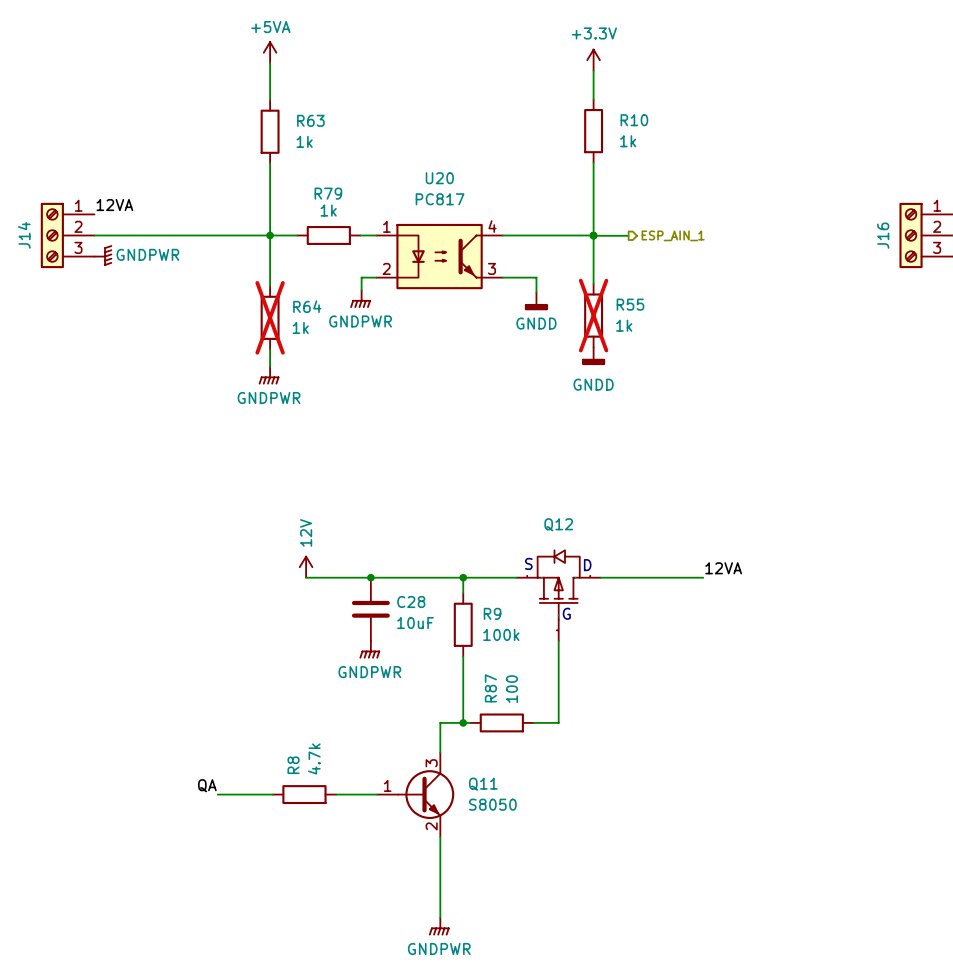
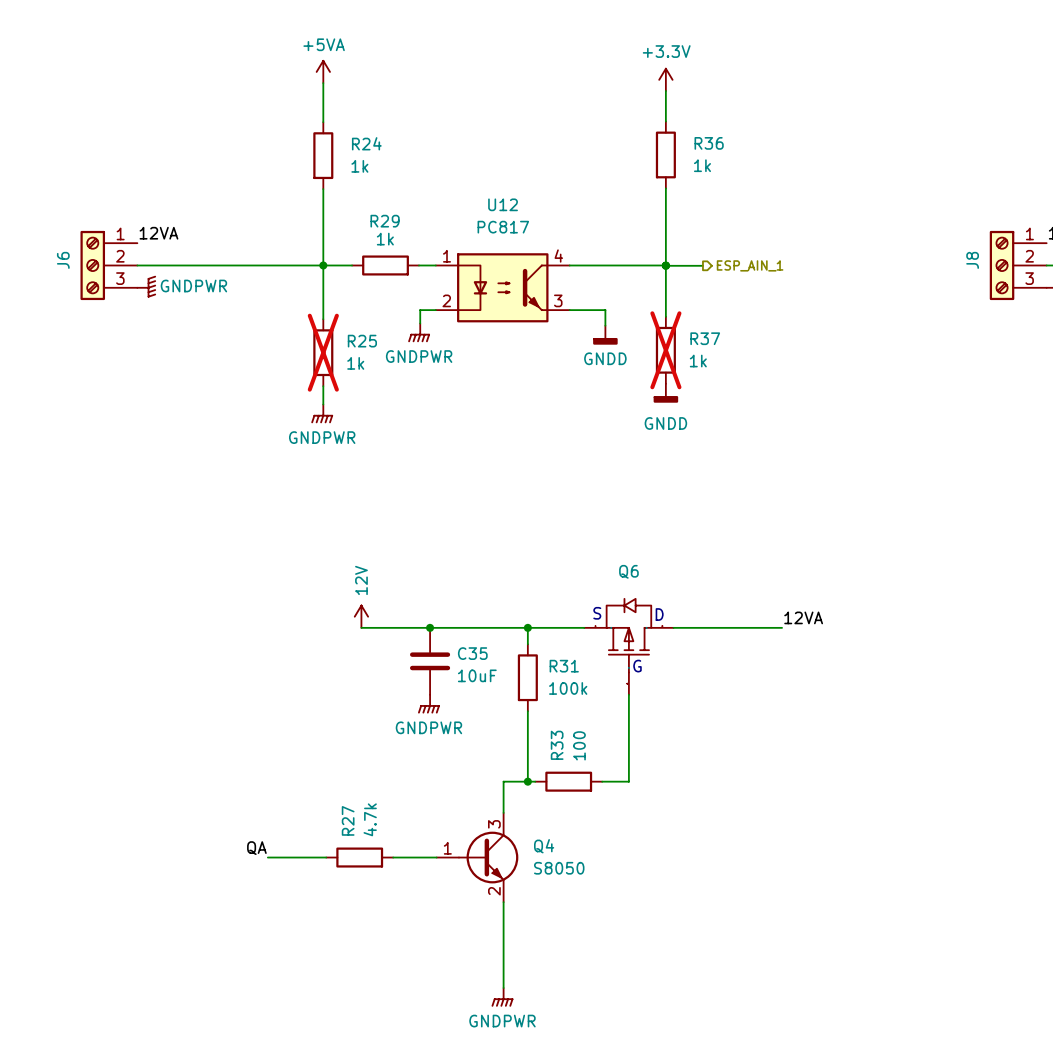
R63 name: R63 (310, 120) -> R24 (366, 143)
R10 name: R10 (634, 120) -> R36 (709, 143)
U20 name: U20 (439, 178) -> U12 (503, 204)
R79 name: R79 (328, 193) -> R29 (385, 221)
J14 name: J14 (24, 235) -> J6 (63, 260)
J16 name: J16 (883, 235) -> J8 (972, 260)
R55 name: R55 (630, 304) -> R37 (705, 338)
R64 name: R64 (307, 306) -> R25 (362, 341)
Q12 name: Q12 (558, 524) -> Q6 (628, 571)
C28 name: C28 (411, 601) -> C35 (472, 653)
R9 name: R9 (492, 613) -> R31 (564, 666)
R87 name: R87 (490, 688) -> R33 (557, 745)
R8 name: R8 (293, 765) -> R27 (348, 820)
Q11 name: Q11 (483, 784) -> Q4 (544, 846)

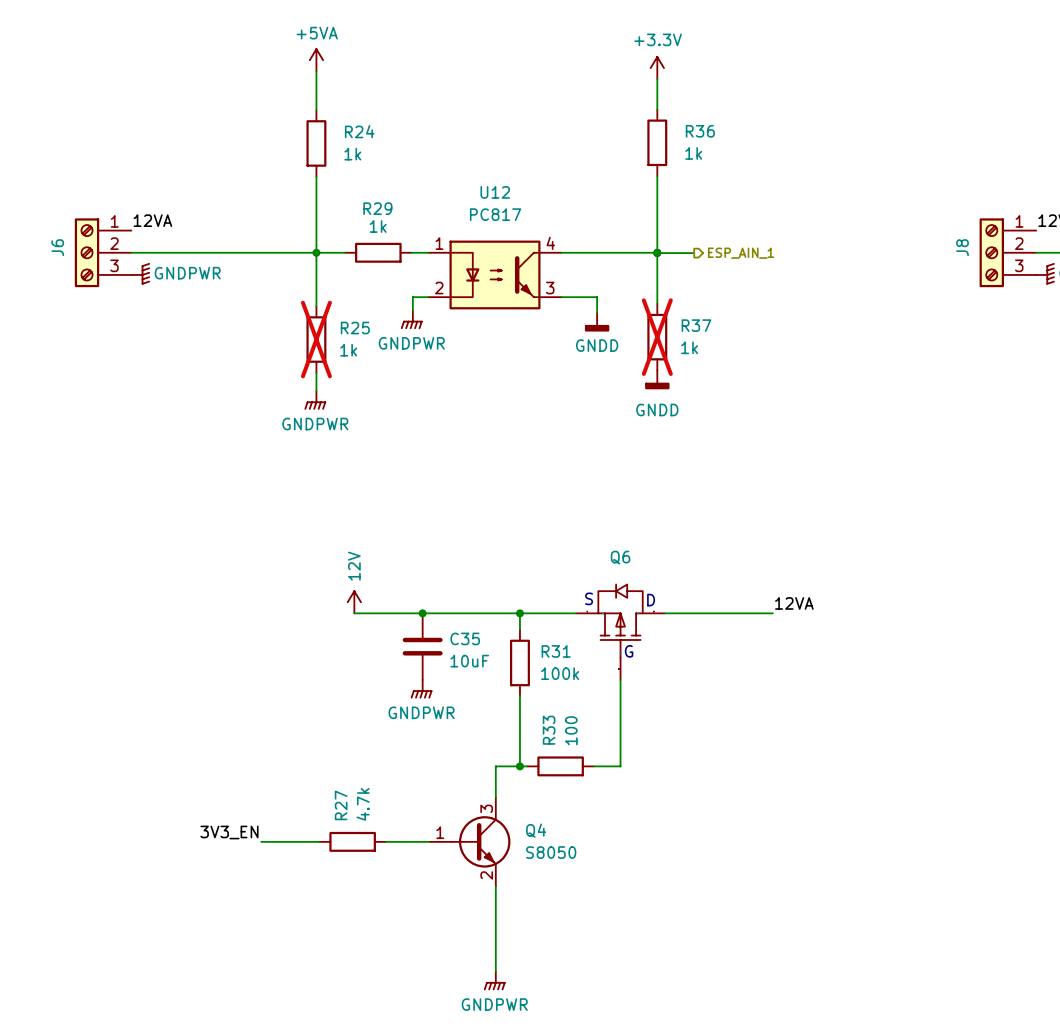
label: QA (256, 848) -> 3V3_EN (229, 832)

